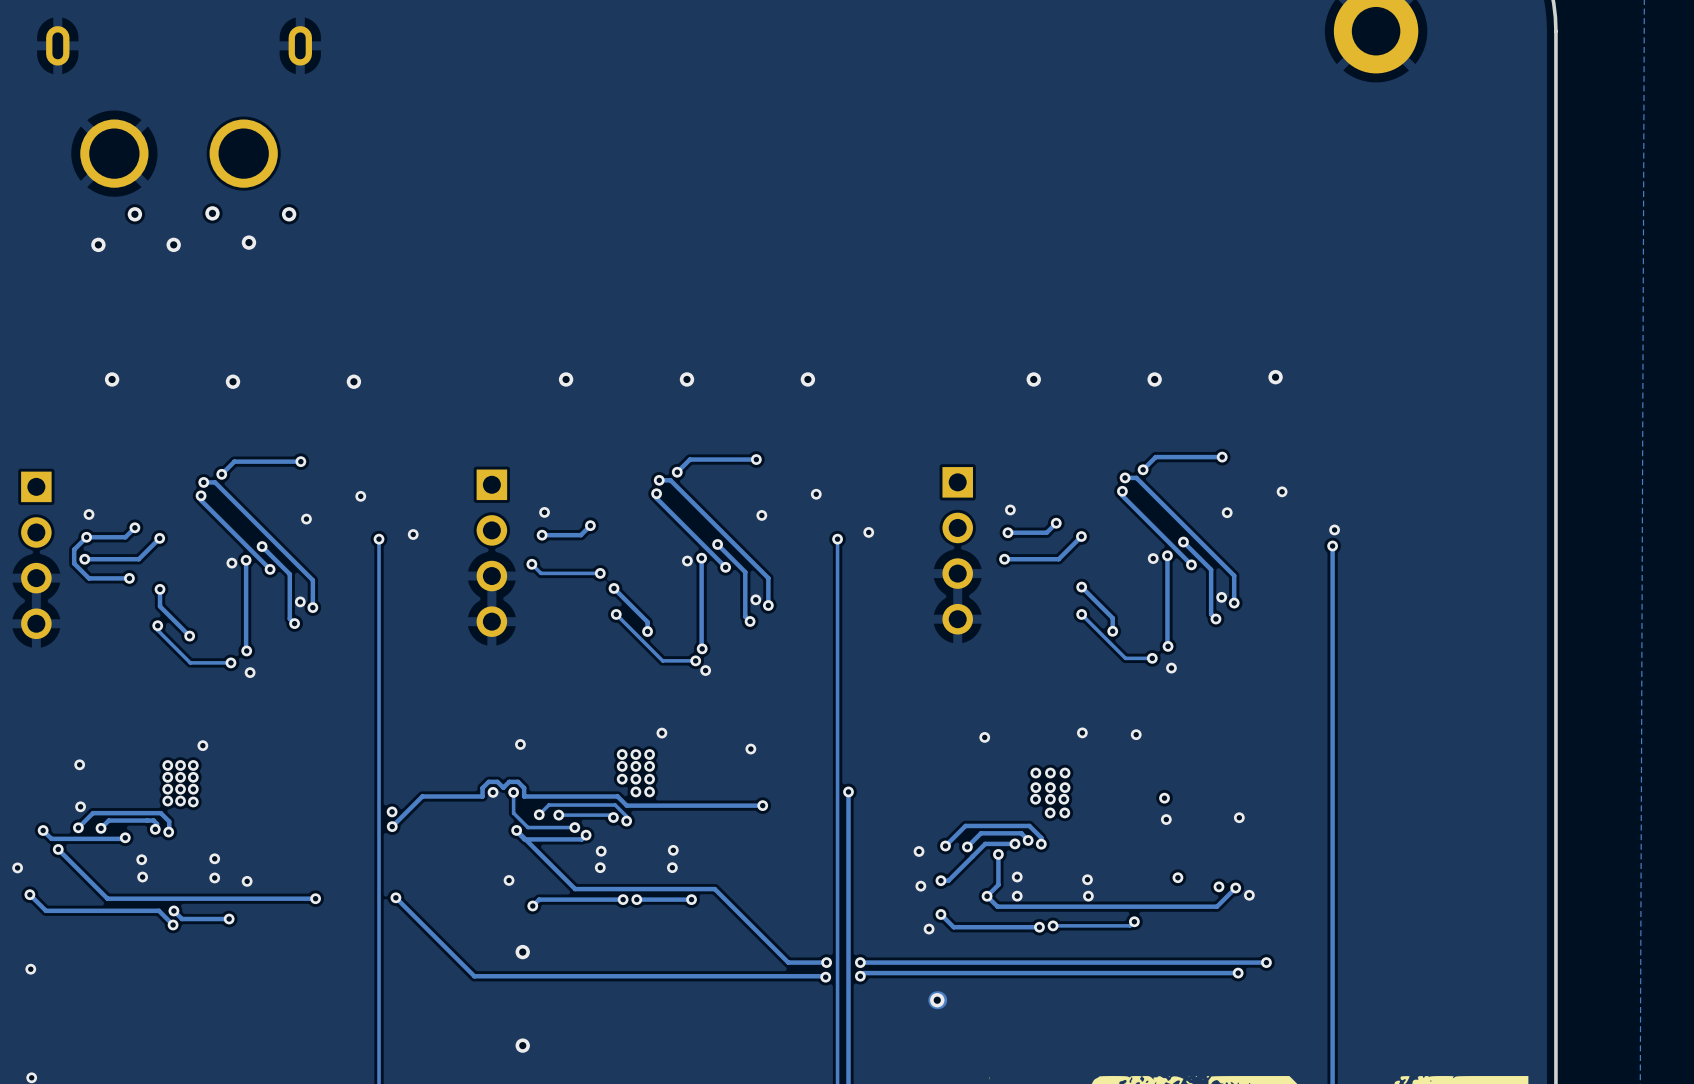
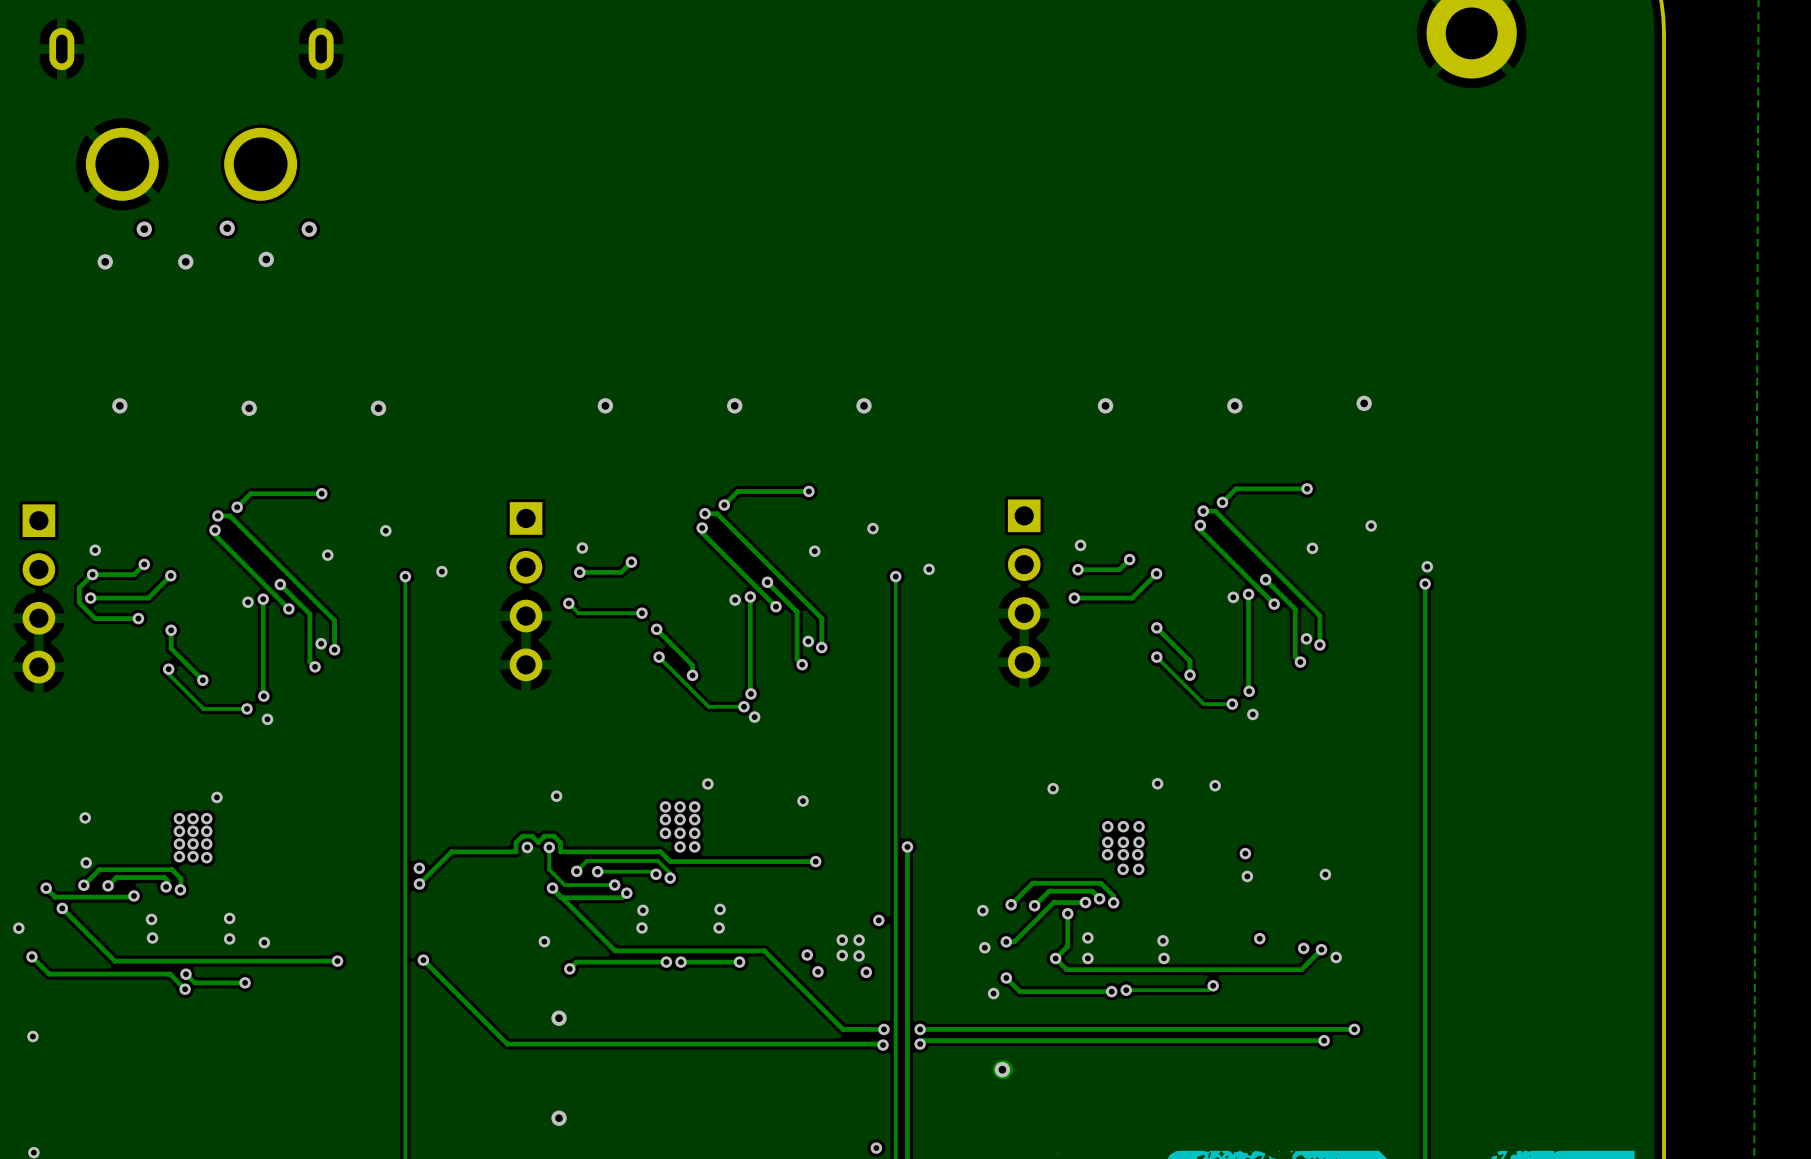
via: none -> (878, 920)
via: none -> (842, 940)
via: none -> (859, 940)
via: none -> (807, 955)
via: none -> (842, 955)
via: none -> (859, 955)
via: none -> (817, 971)
via: none -> (866, 972)
via: none -> (876, 1148)

